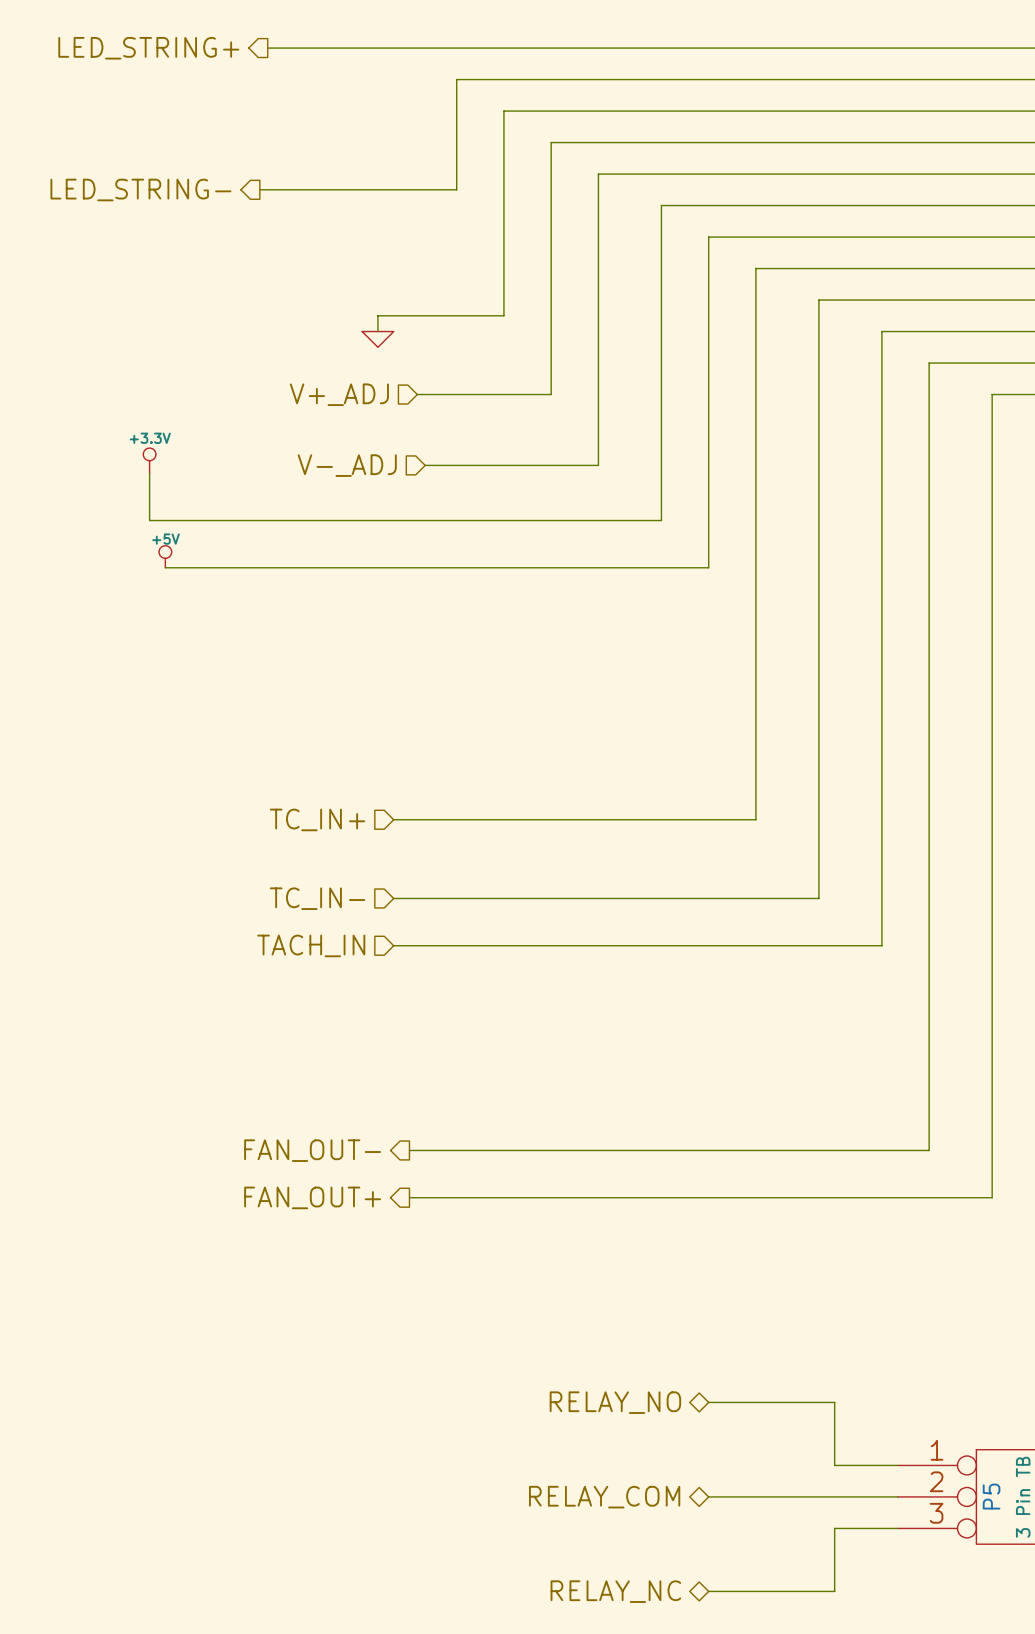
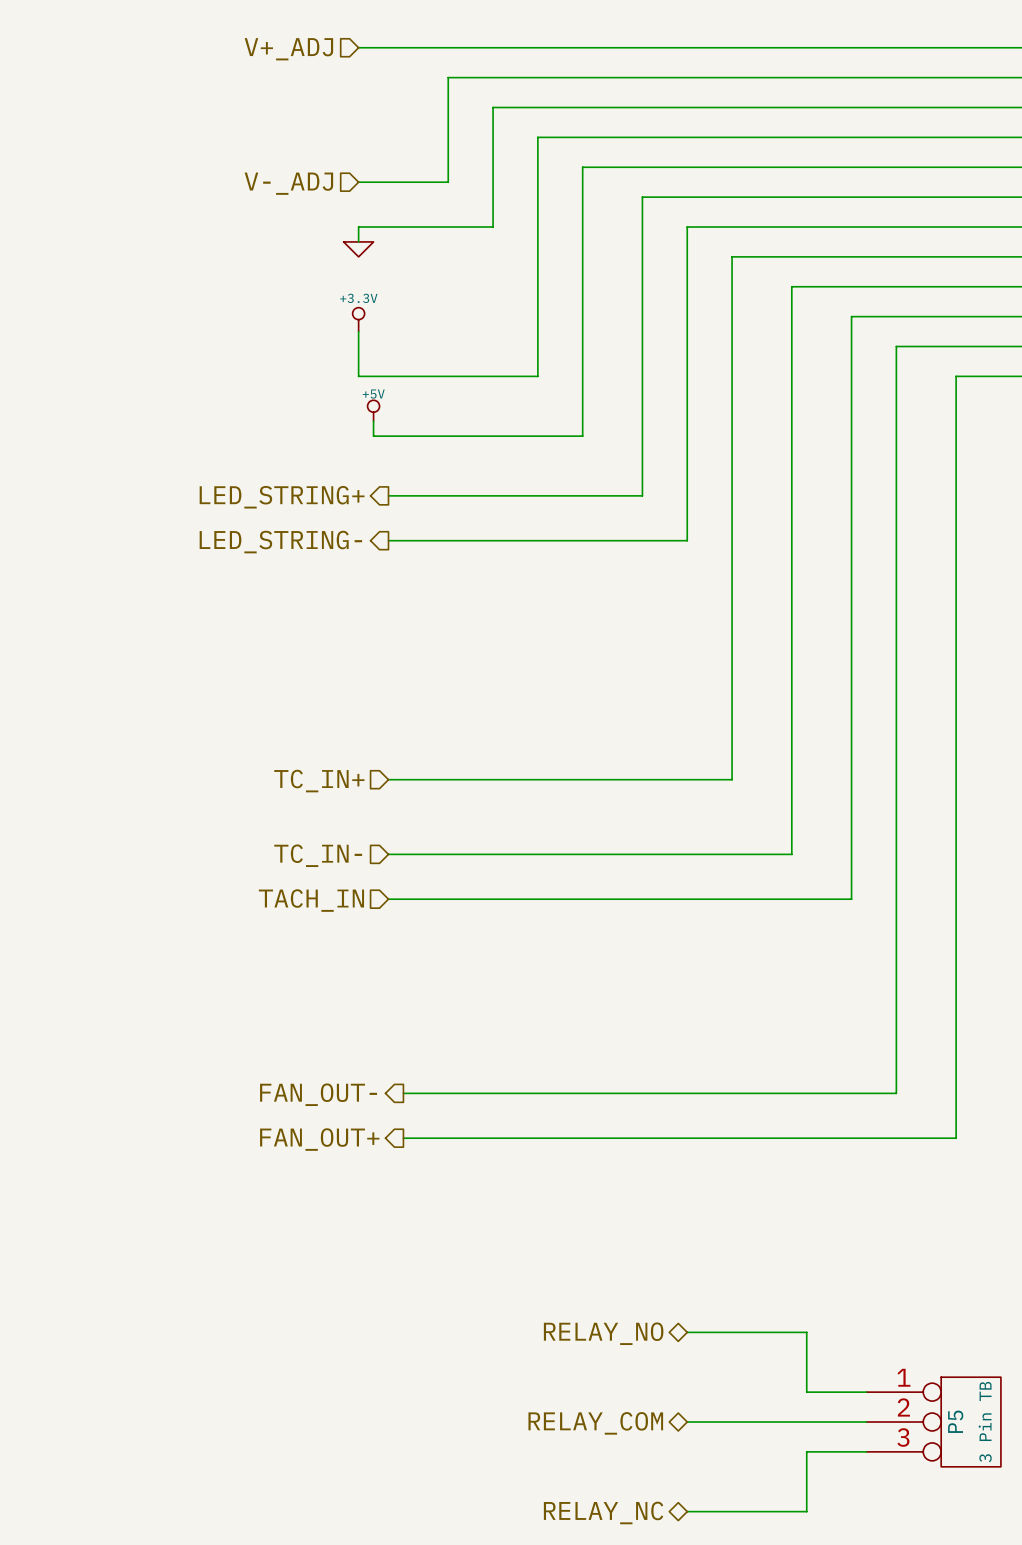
hierarchical label: LED_STRING+ (148, 48) -> none
wire: (267, 48) (362, 48) -> none
hierarchical label: none -> V+_ADJ (288, 49)
wire: (259, 189) (362, 189) -> none
hierarchical label: LED_STRING- (140, 190) -> none
wire: (503, 237) (503, 315) (377, 315) (377, 331) -> (493, 227) (358, 227) (358, 241)
power symbol position: (377, 339) -> (358, 249)
wire: none -> (358, 331) (358, 376) (410, 376)
hierarchical label: V+_ADJ (339, 394) -> none
wire: (598, 457) (598, 465) (425, 465) -> (582, 436) (373, 436) (373, 421)
power symbol position: +3.3V (149, 460) -> +3.3V (358, 319)
hierarchical label position: V-_ADJ (347, 465) -> V-_ADJ (288, 183)
wire: (149, 473) (149, 520) (393, 520) -> none
hierarchical label: none -> LED_STRING+ (282, 497)
power symbol position: +5V (165, 556) -> +5V (373, 410)
wire: (165, 567) (393, 567) -> none
hierarchical label: none -> LED_STRING- (280, 542)

